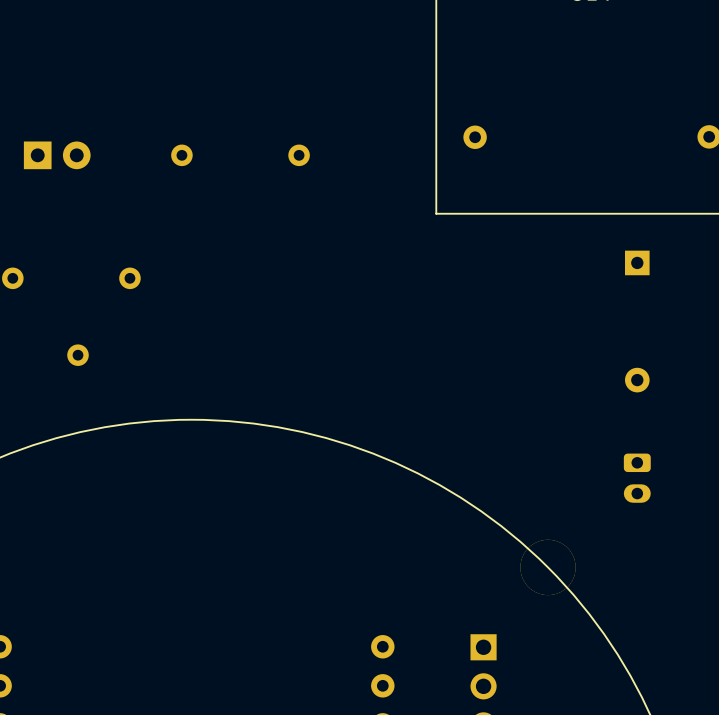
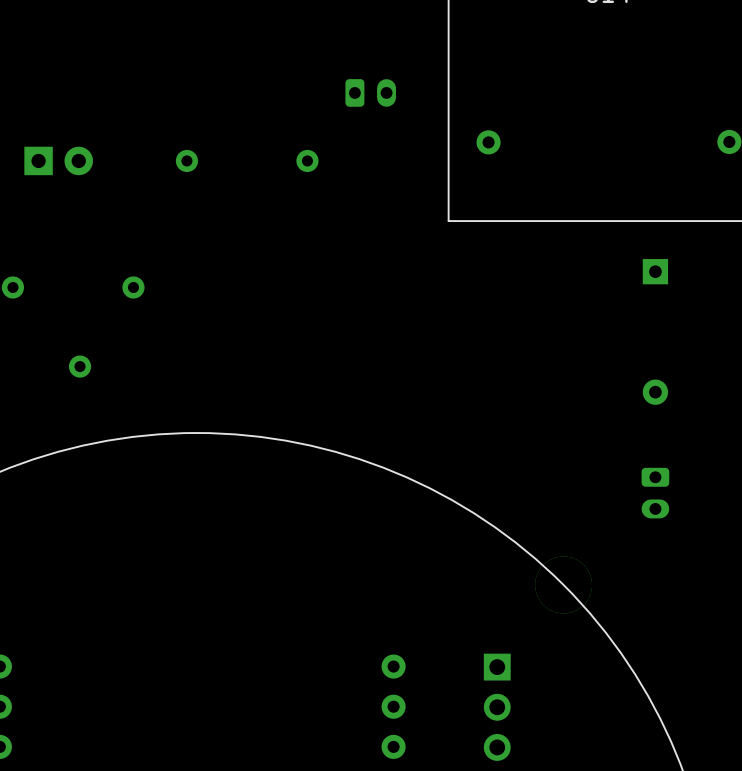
part: none -> (370, 92)

